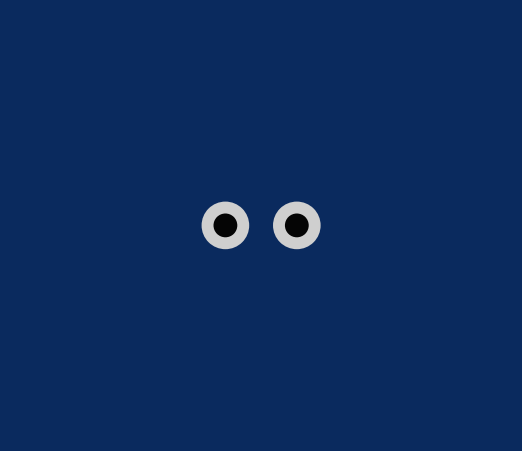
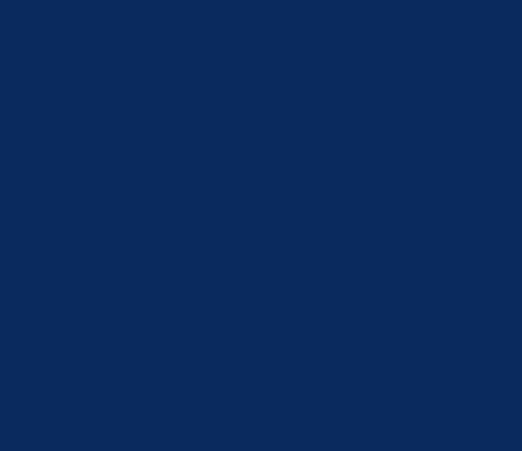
part: (261, 225) -> none

